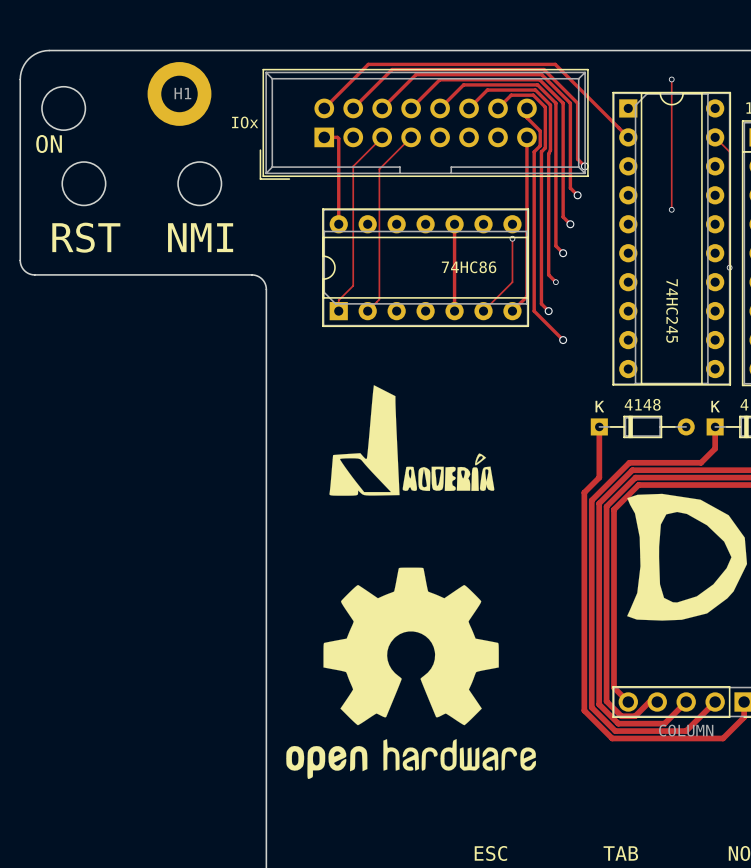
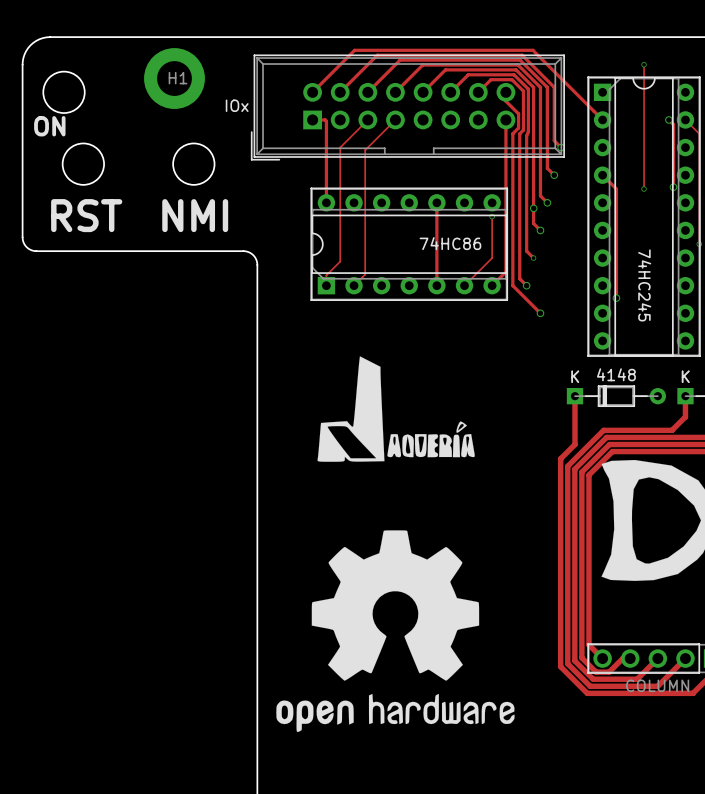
track: none -> (668, 119) (673, 124) (673, 187)
via: none -> (668, 119)
track: none -> (602, 175) (616, 189) (616, 298)
via: none -> (673, 187)
via: none -> (533, 208)
via: none -> (616, 298)

